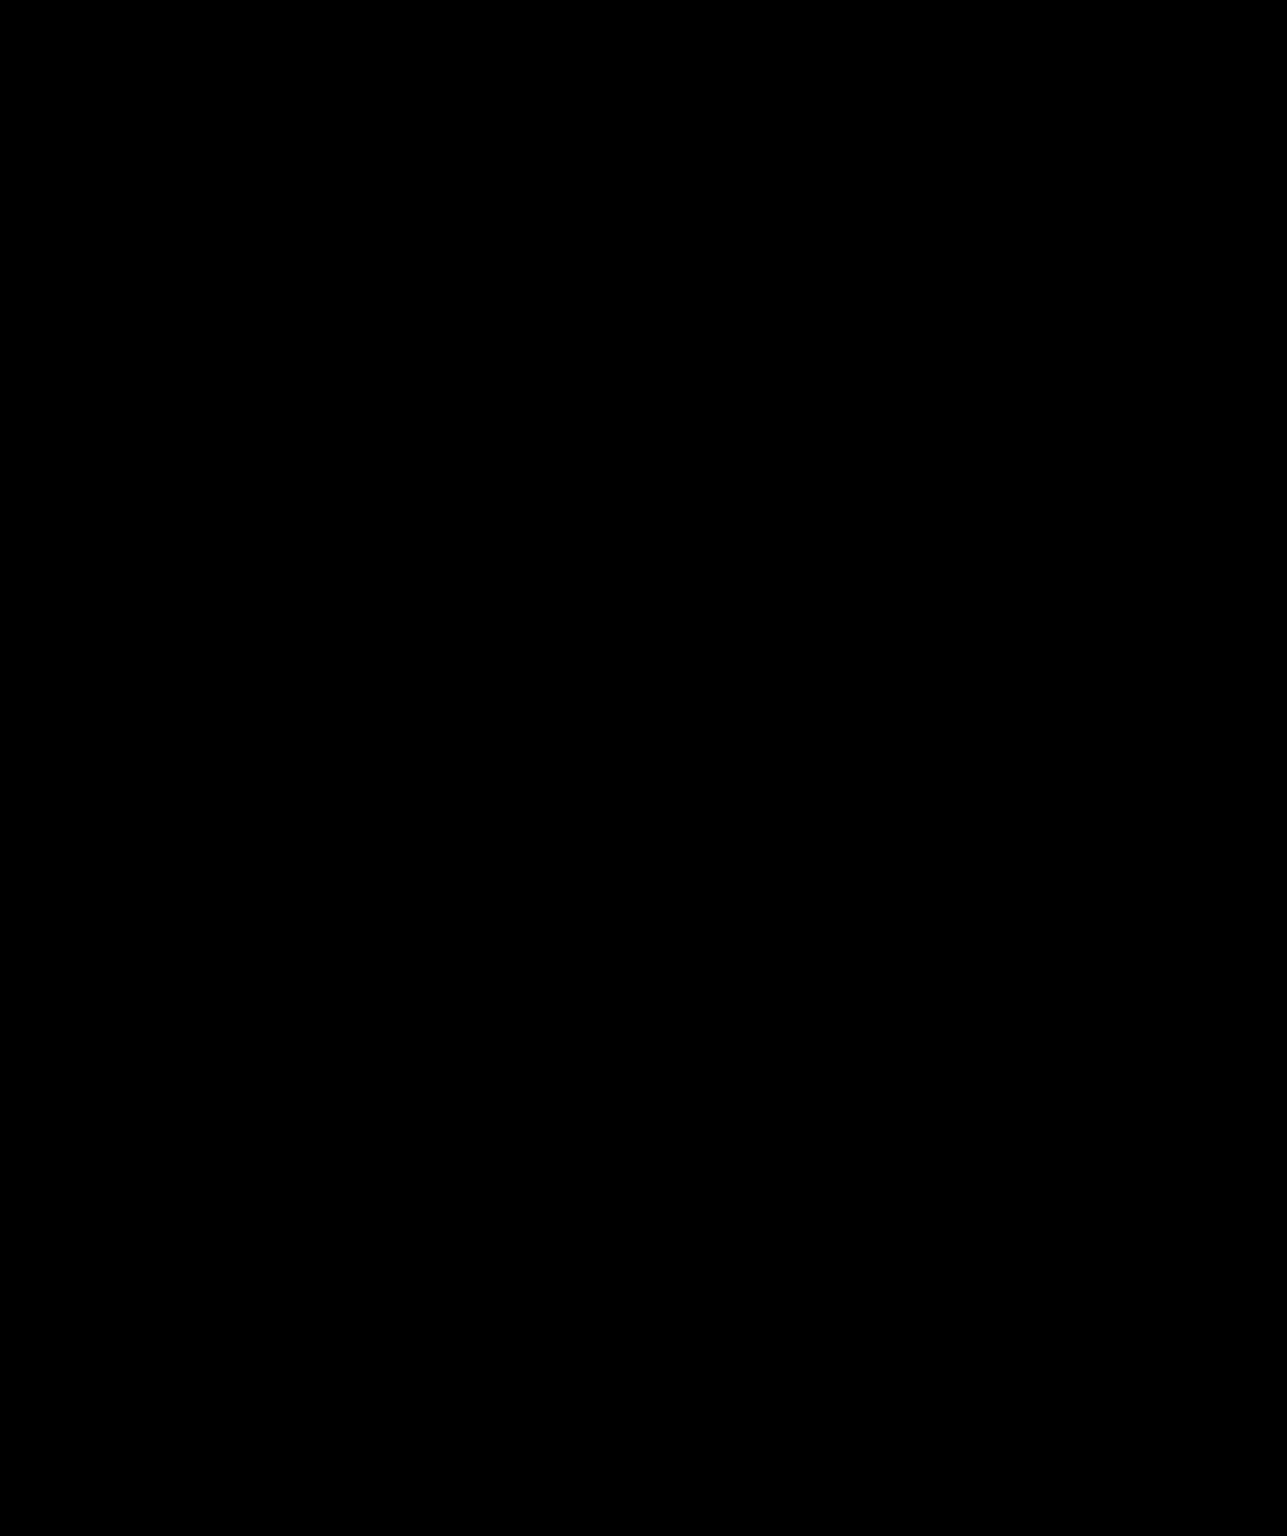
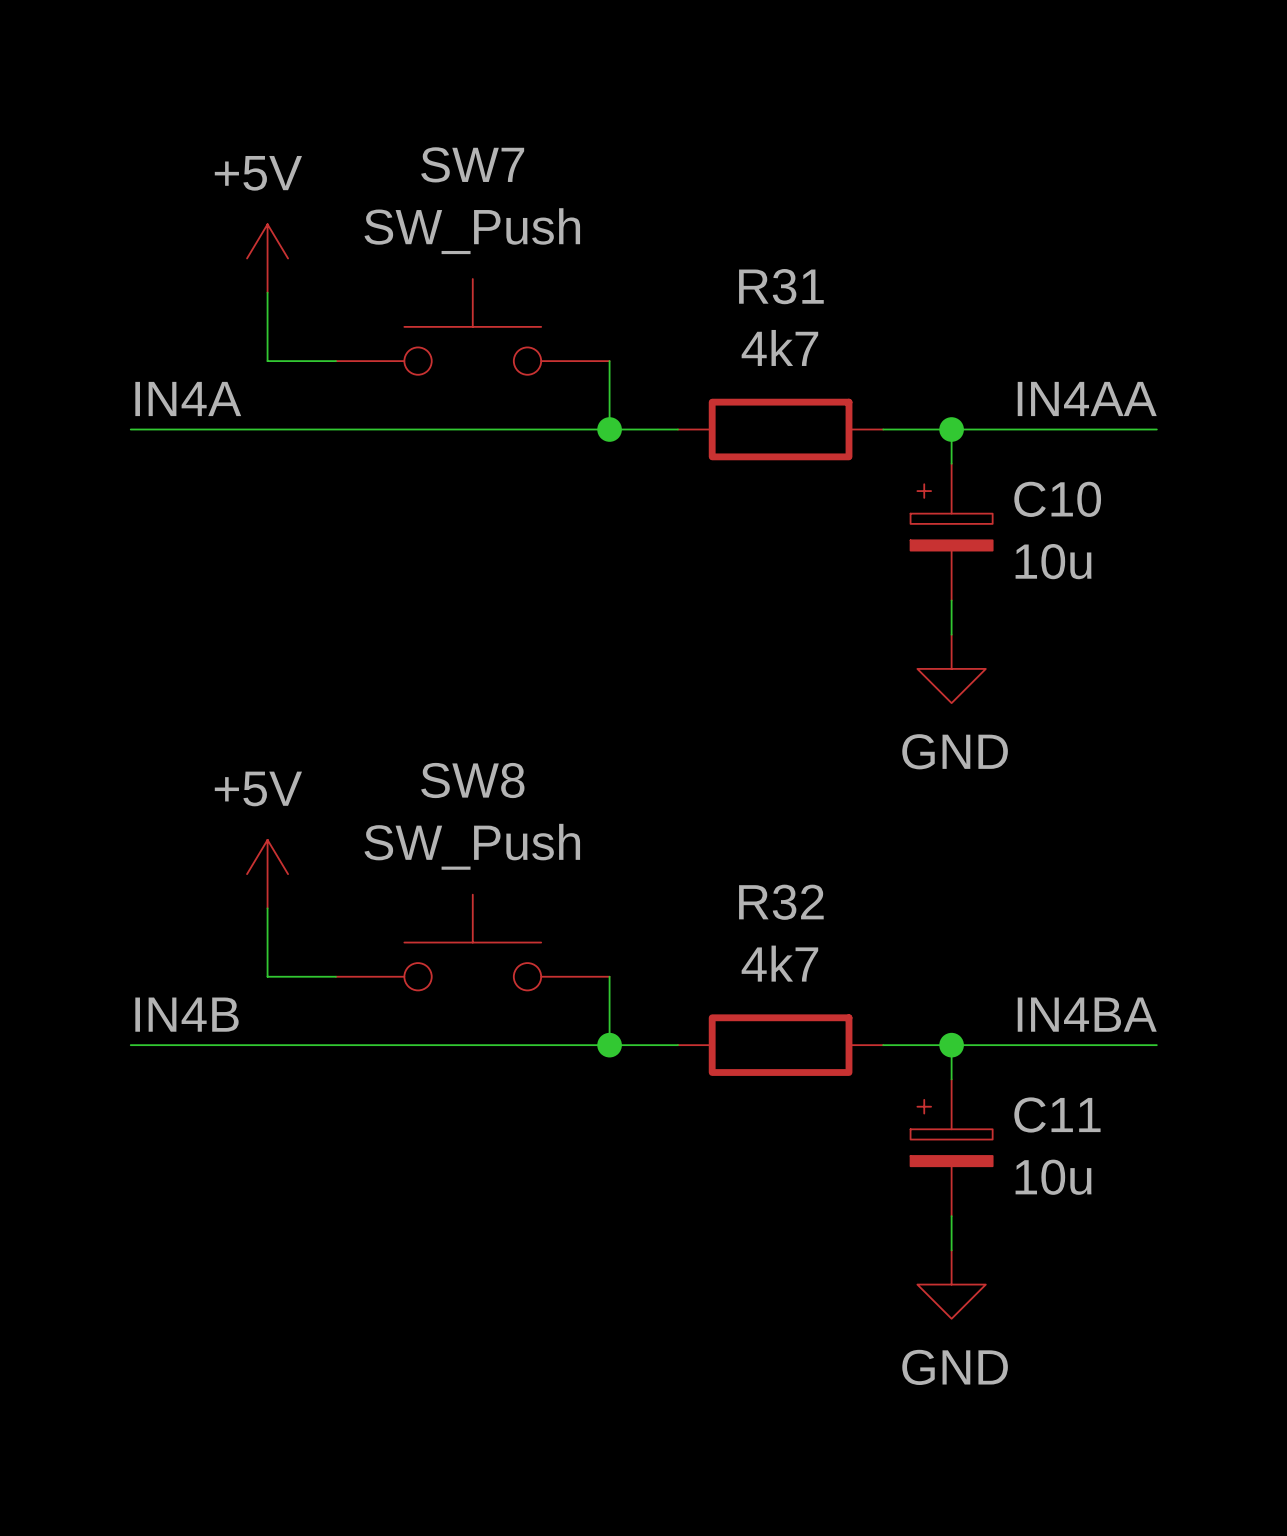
power symbol: none -> +5V (267, 258)
wire: none -> (267, 292) (267, 361) (335, 361)
SW7: none -> SW_Push (472, 326)
wire: none -> (609, 361) (609, 429)
label: none -> IN4A (188, 398)
label: none -> IN4AA (1087, 398)
wire: none -> (130, 429) (677, 429)
junction: none -> (609, 429)
R31: none -> 4k7 (780, 429)
wire: none -> (883, 429) (1156, 429)
wire: none -> (951, 429) (951, 463)
junction: none -> (951, 429)
C10: none -> 10u (951, 532)
wire: none -> (951, 600) (951, 634)
power symbol: none -> GND (951, 668)
power symbol: none -> +5V (267, 874)
wire: none -> (267, 908) (267, 976) (335, 976)
SW8: none -> SW_Push (472, 942)
wire: none -> (609, 976) (609, 1045)
label: none -> IN4B (186, 1014)
label: none -> IN4BA (1087, 1014)
wire: none -> (130, 1045) (677, 1045)
junction: none -> (609, 1045)
R32: none -> 4k7 (780, 1045)
wire: none -> (883, 1045) (1156, 1045)
wire: none -> (951, 1045) (951, 1079)
junction: none -> (951, 1045)
C11: none -> 10u (951, 1147)
wire: none -> (951, 1216) (951, 1250)
power symbol: none -> GND (951, 1284)

